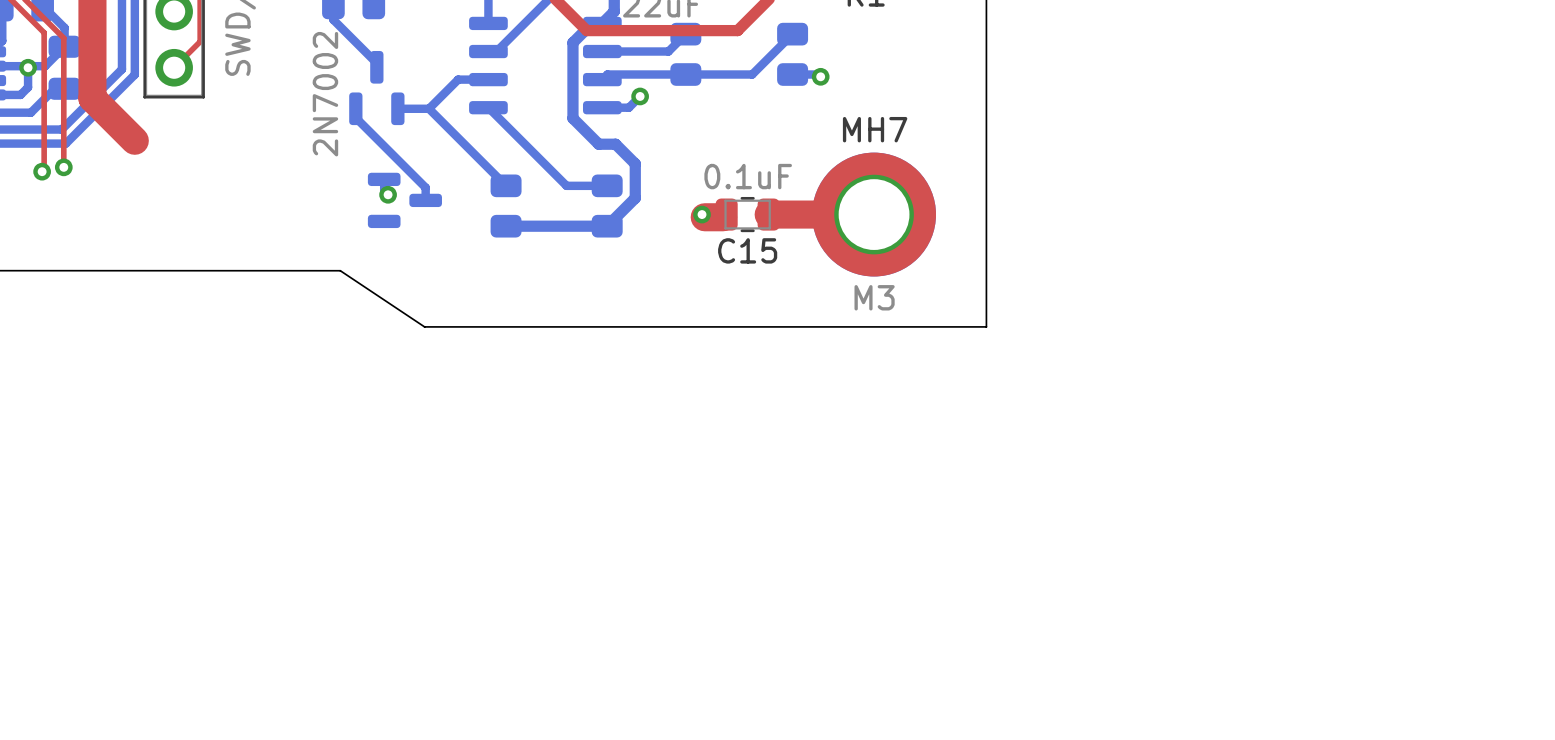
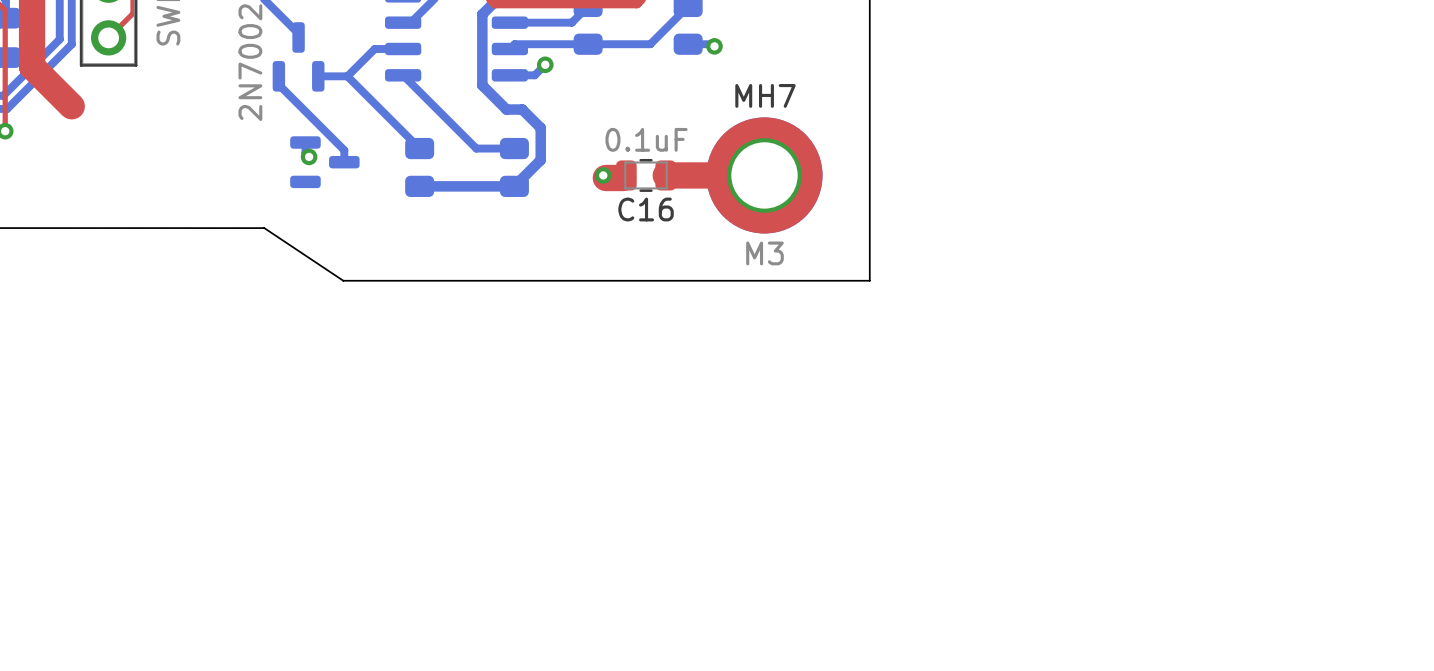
C15 name: C15 (747, 250) -> C16 (646, 209)

